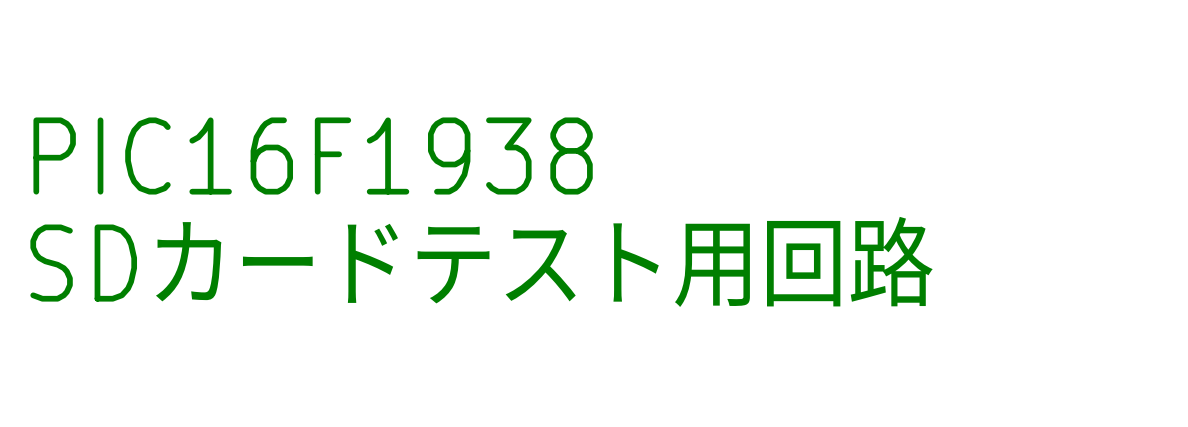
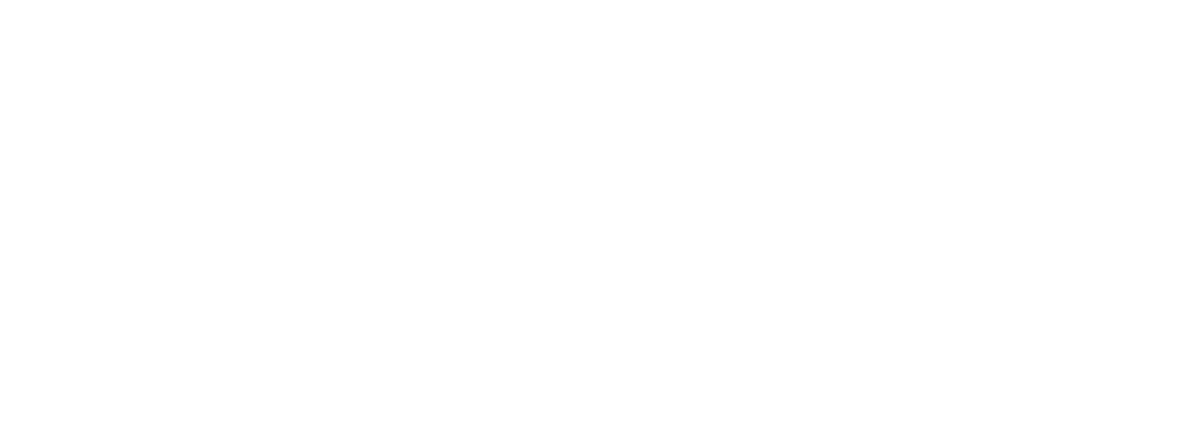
text: PIC16F1938 (313, 156) -> none
text: SDカードテスト用回路 (482, 261) -> none

